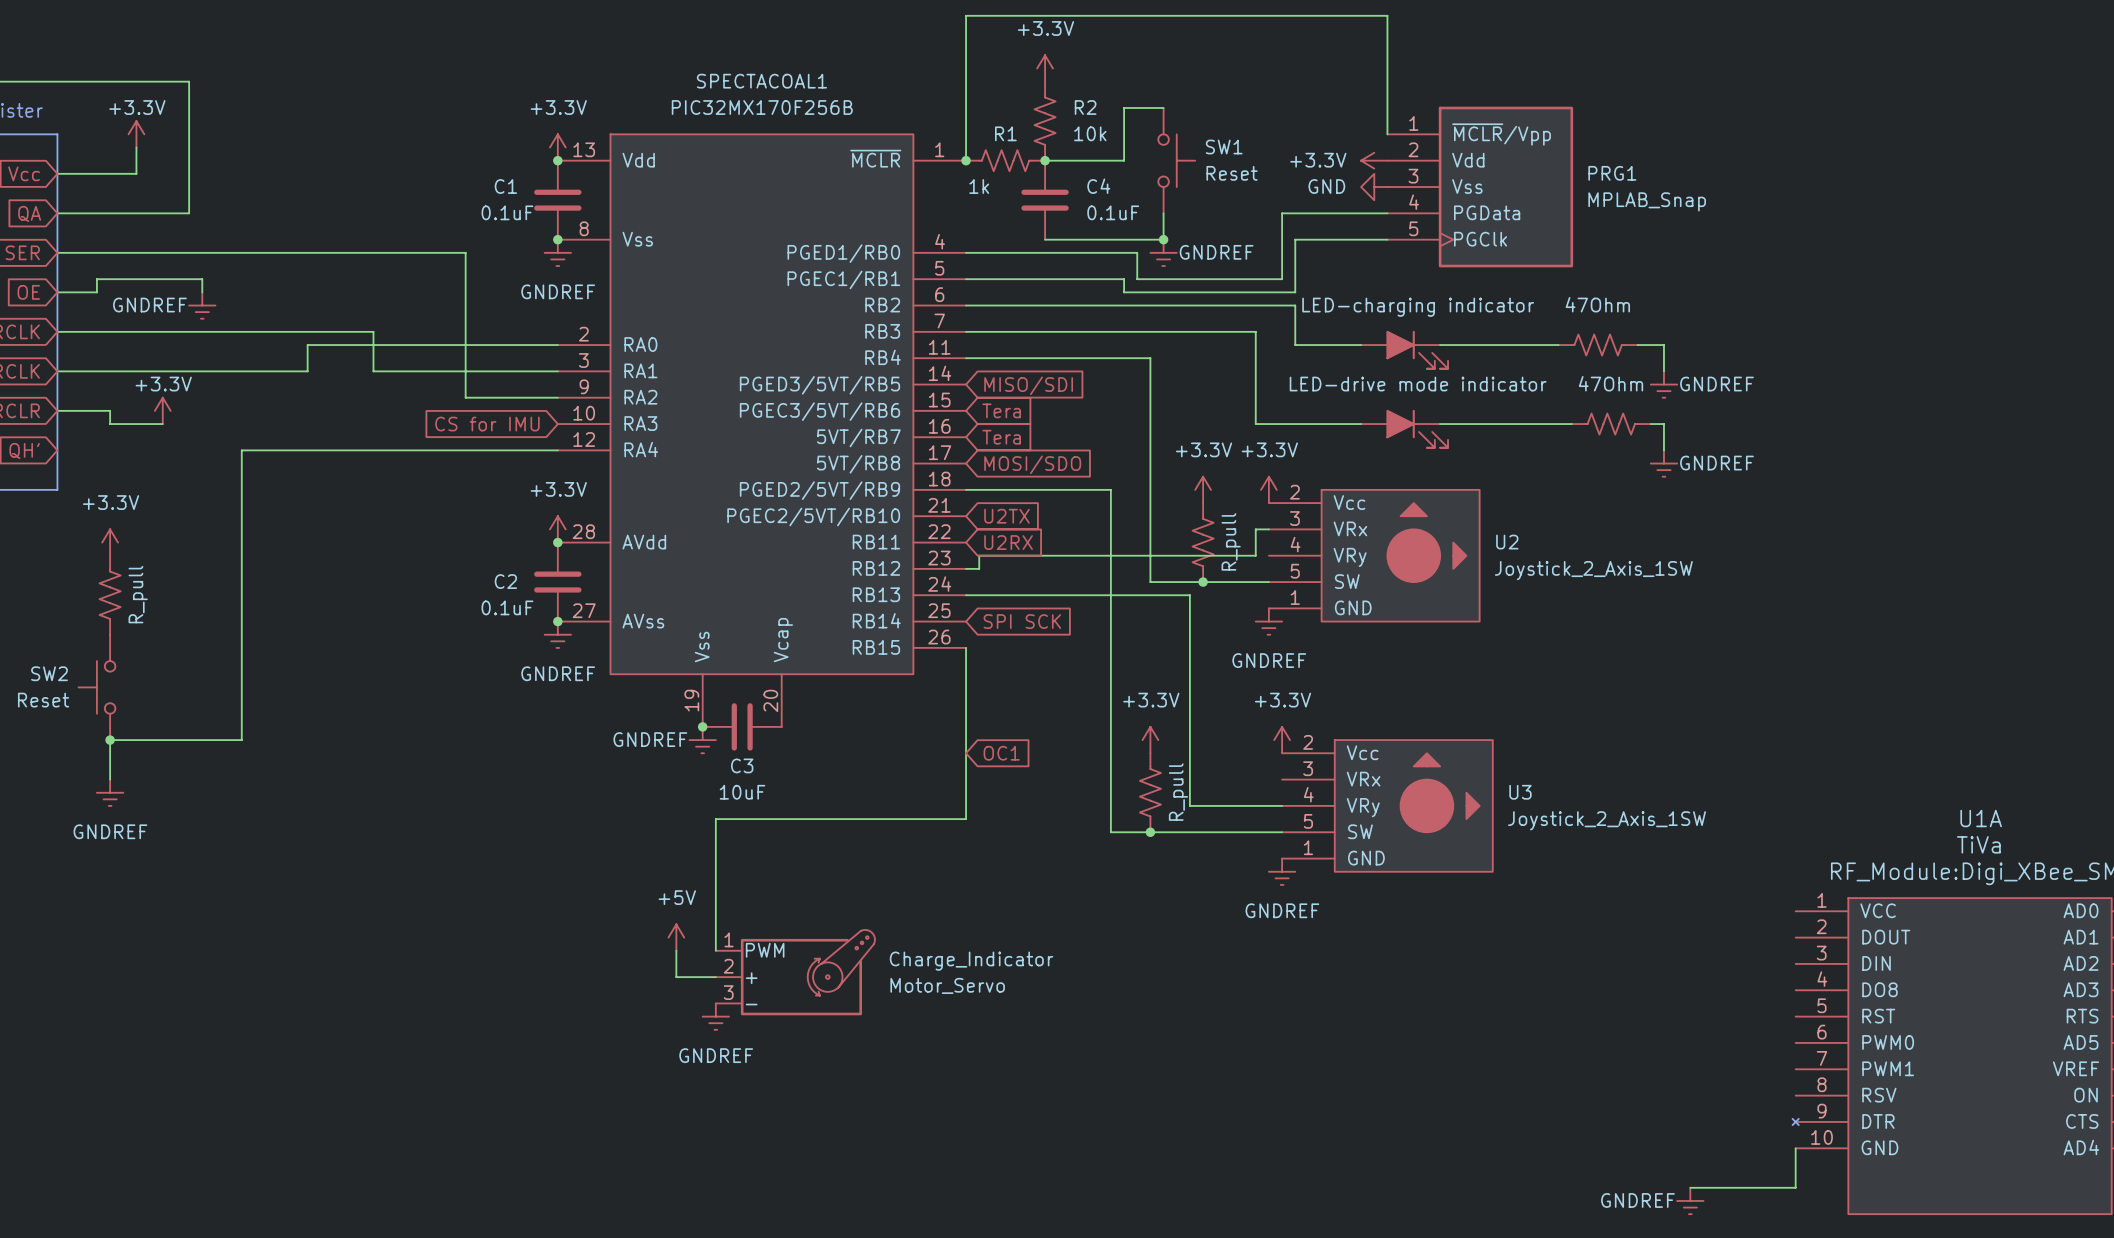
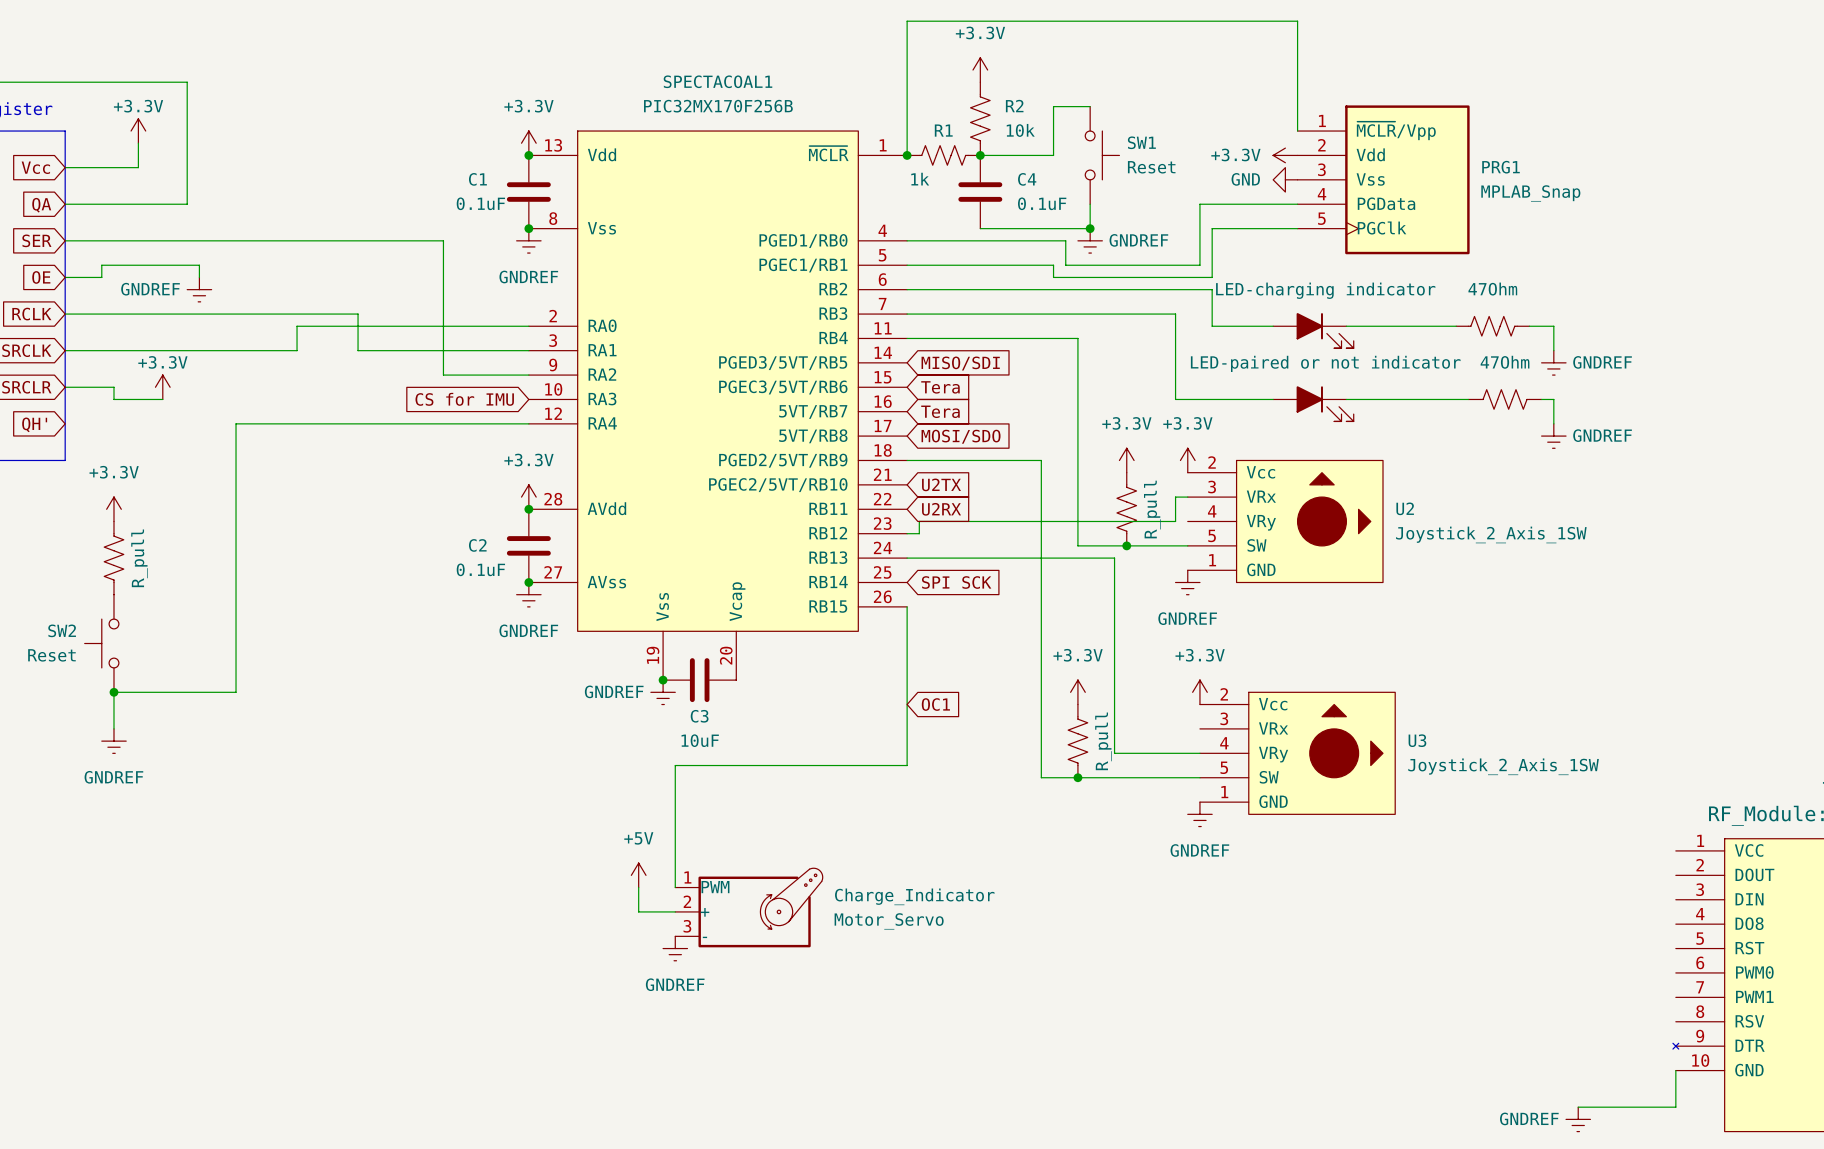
part value: LED-drive mode indicator (1418, 384) -> LED-paired or not indicator (1325, 363)

